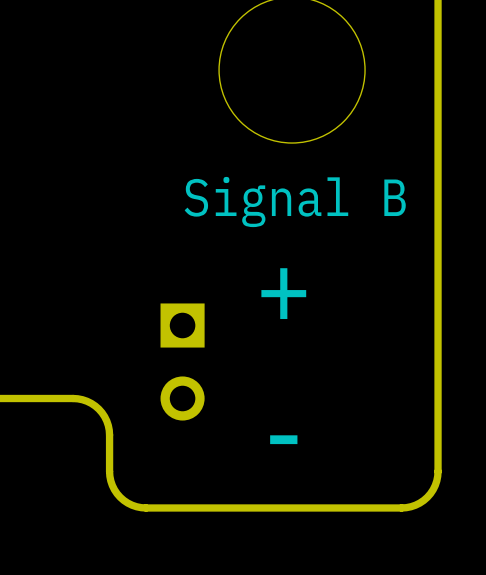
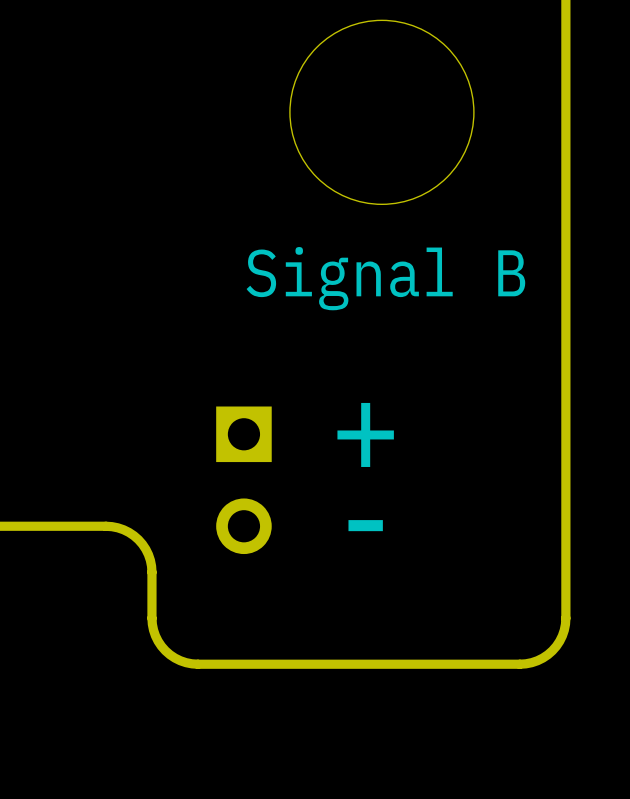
text position: + (283, 293) -> + (365, 434)
text position: - (283, 439) -> - (365, 525)

